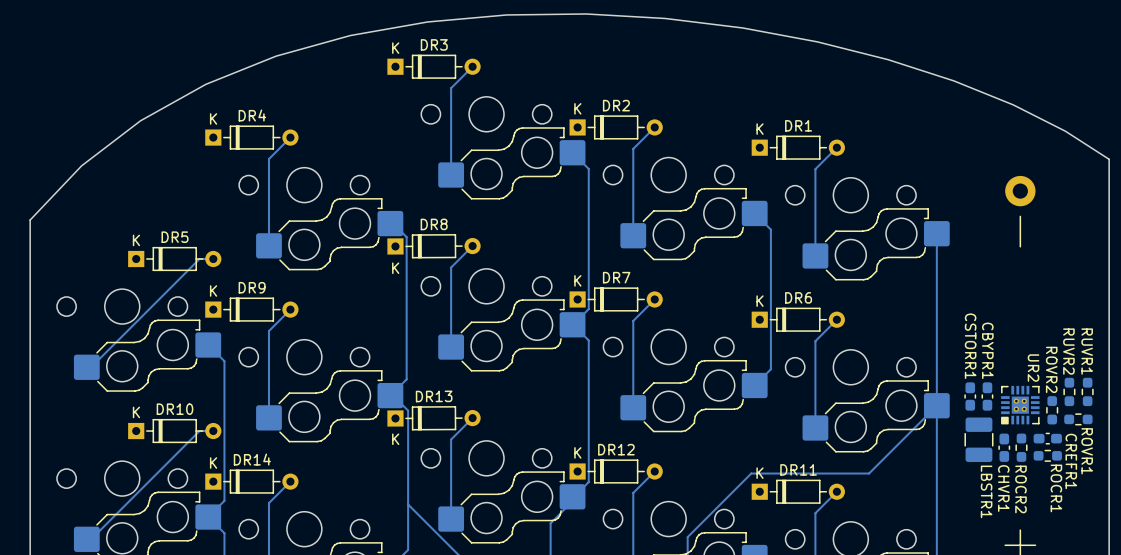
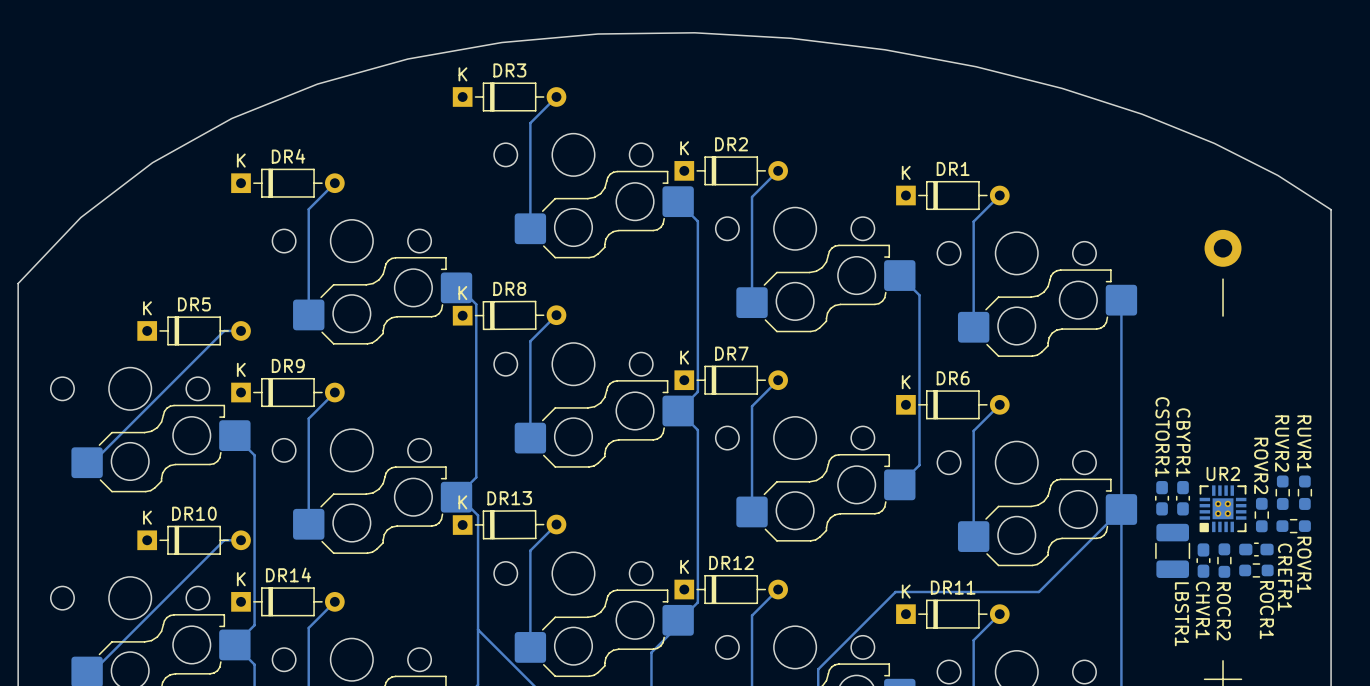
DR8 text position: K (395, 268) -> K (462, 293)
UR2 name rotation: 0° (1033, 368) -> 90° counterclockwise (1223, 473)
DR13 text position: K (395, 439) -> K (462, 502)

